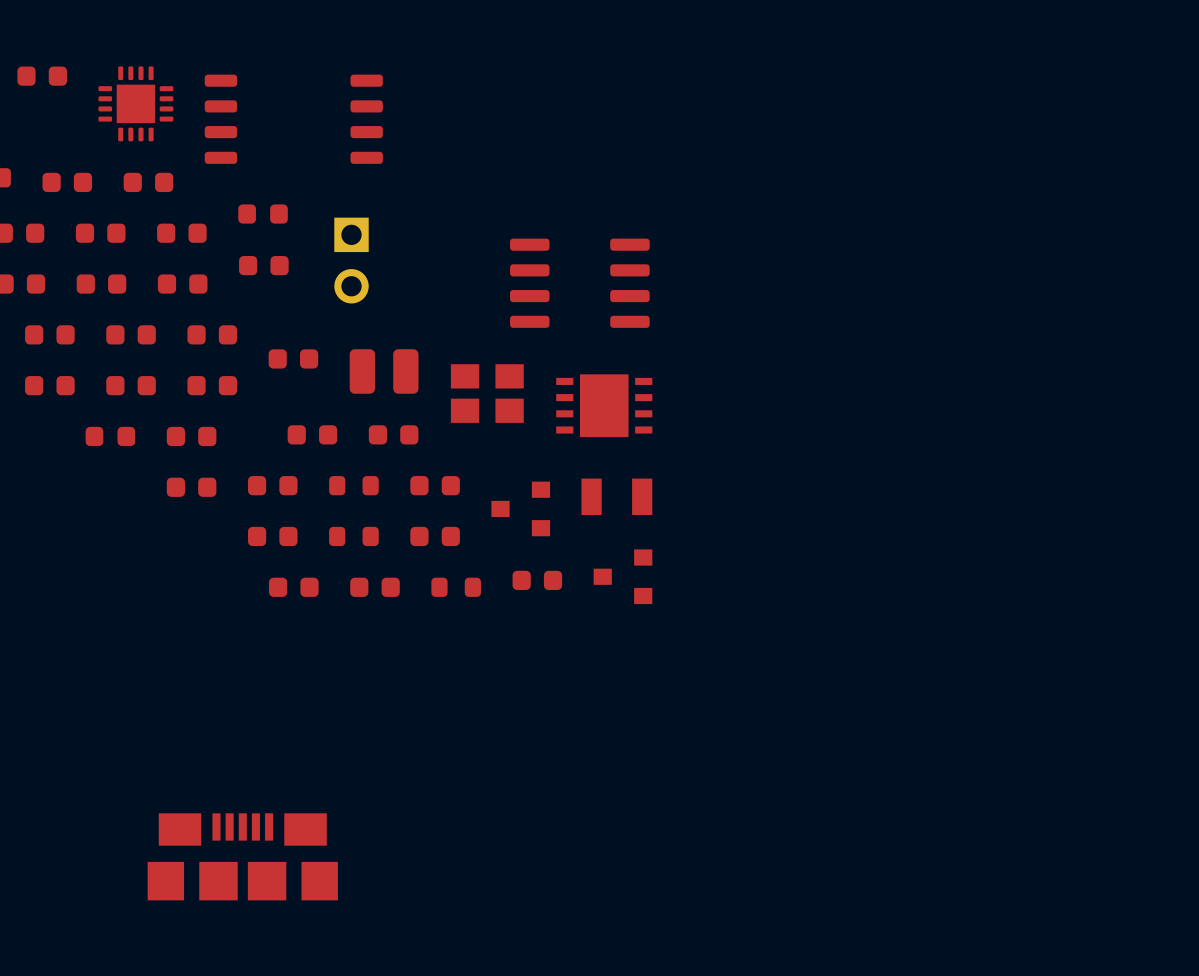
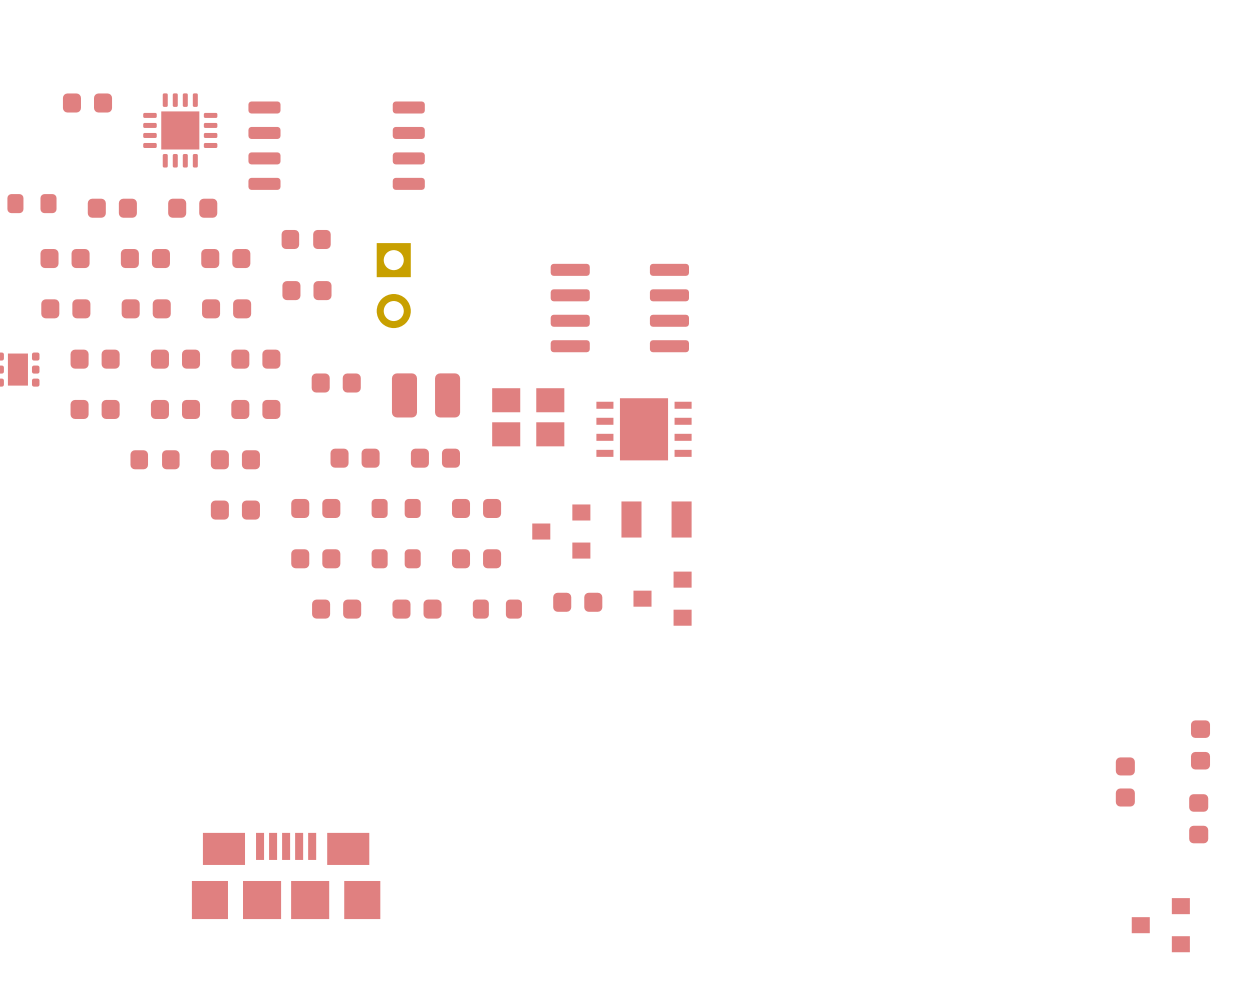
part: none -> (1200, 744)
part: none -> (1125, 781)
part: none -> (1198, 818)
part: none -> (1160, 925)

